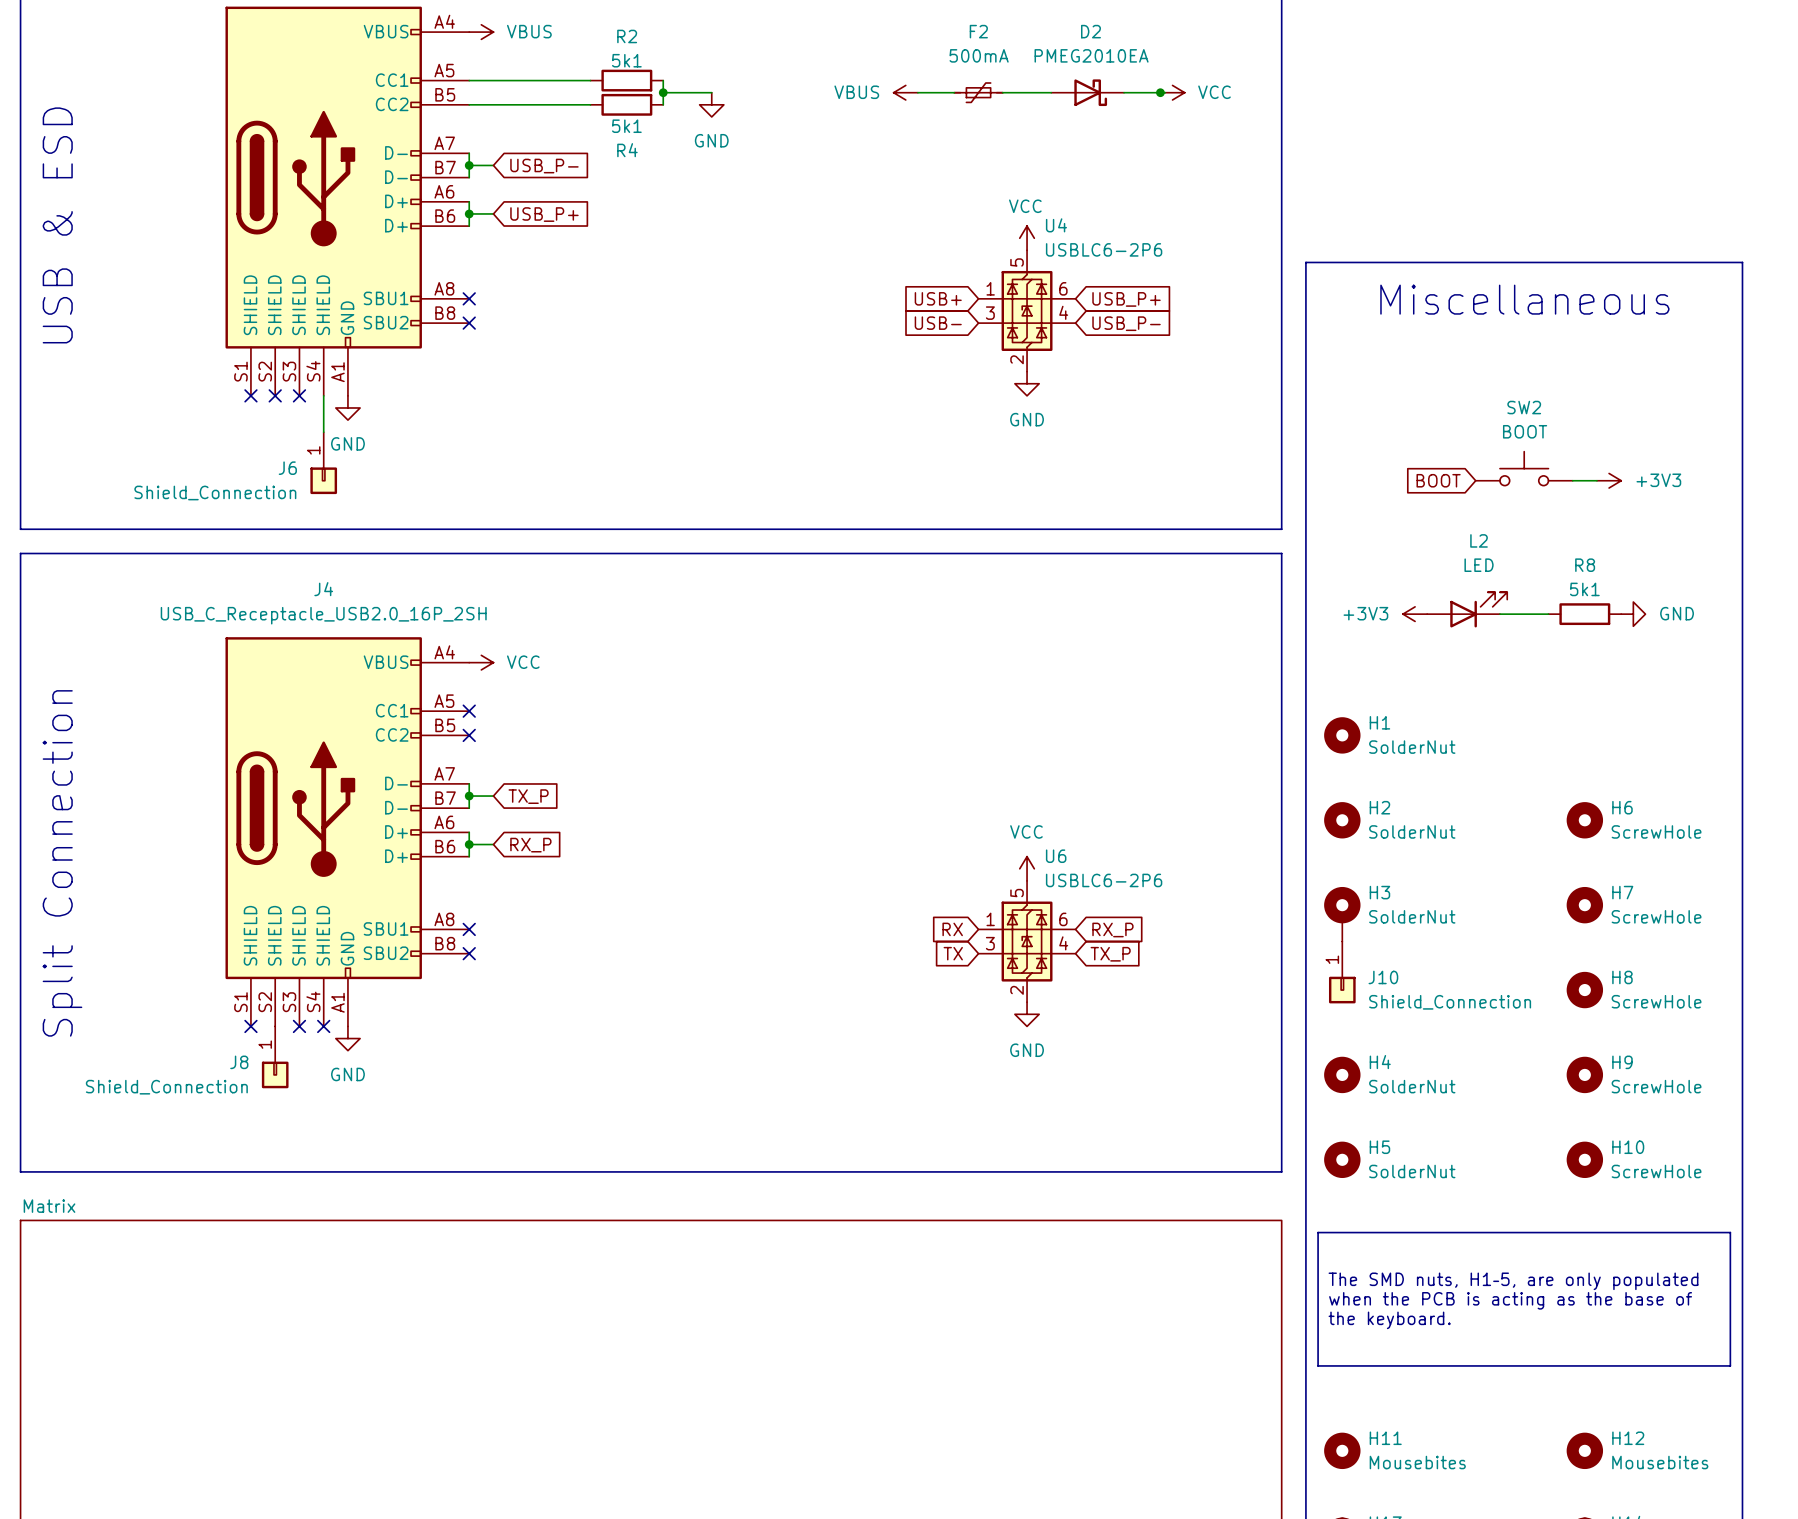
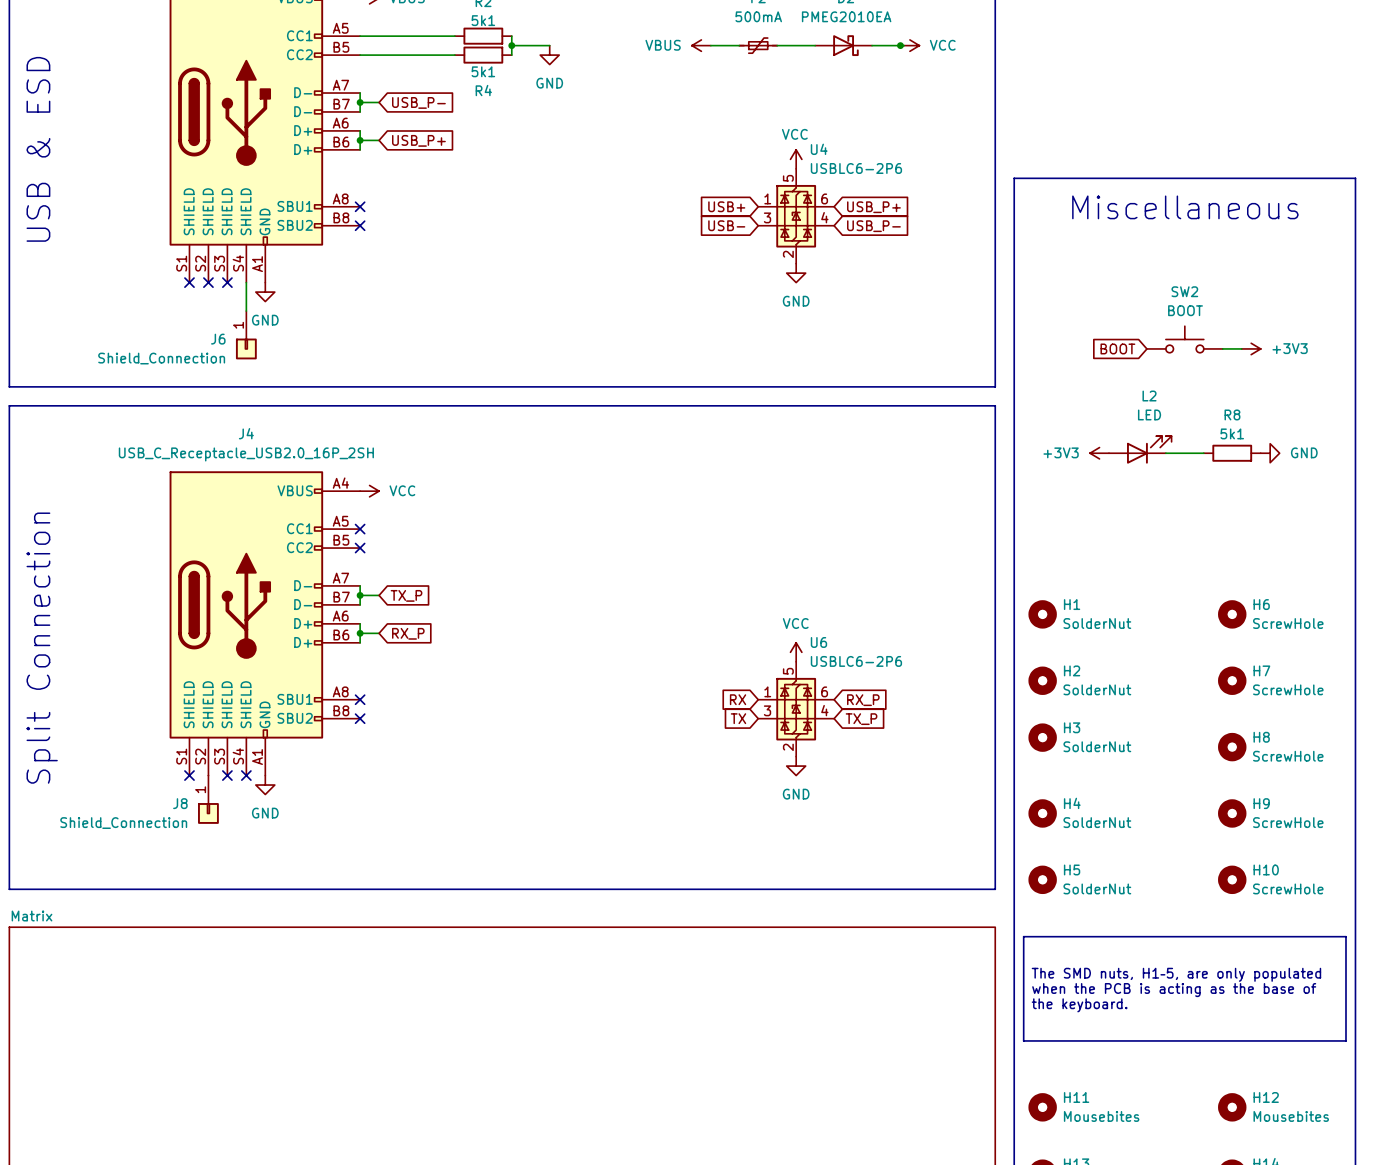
H1: SolderNut (1342, 735) -> none
H2 name: H2 (1379, 807) -> H1 (1072, 604)
H3 symbol: [1324, 886, 1361, 942] -> [1028, 723, 1057, 752]
H2: none -> SolderNut (1042, 680)
J10: Shield_Connection (1342, 972) -> none

